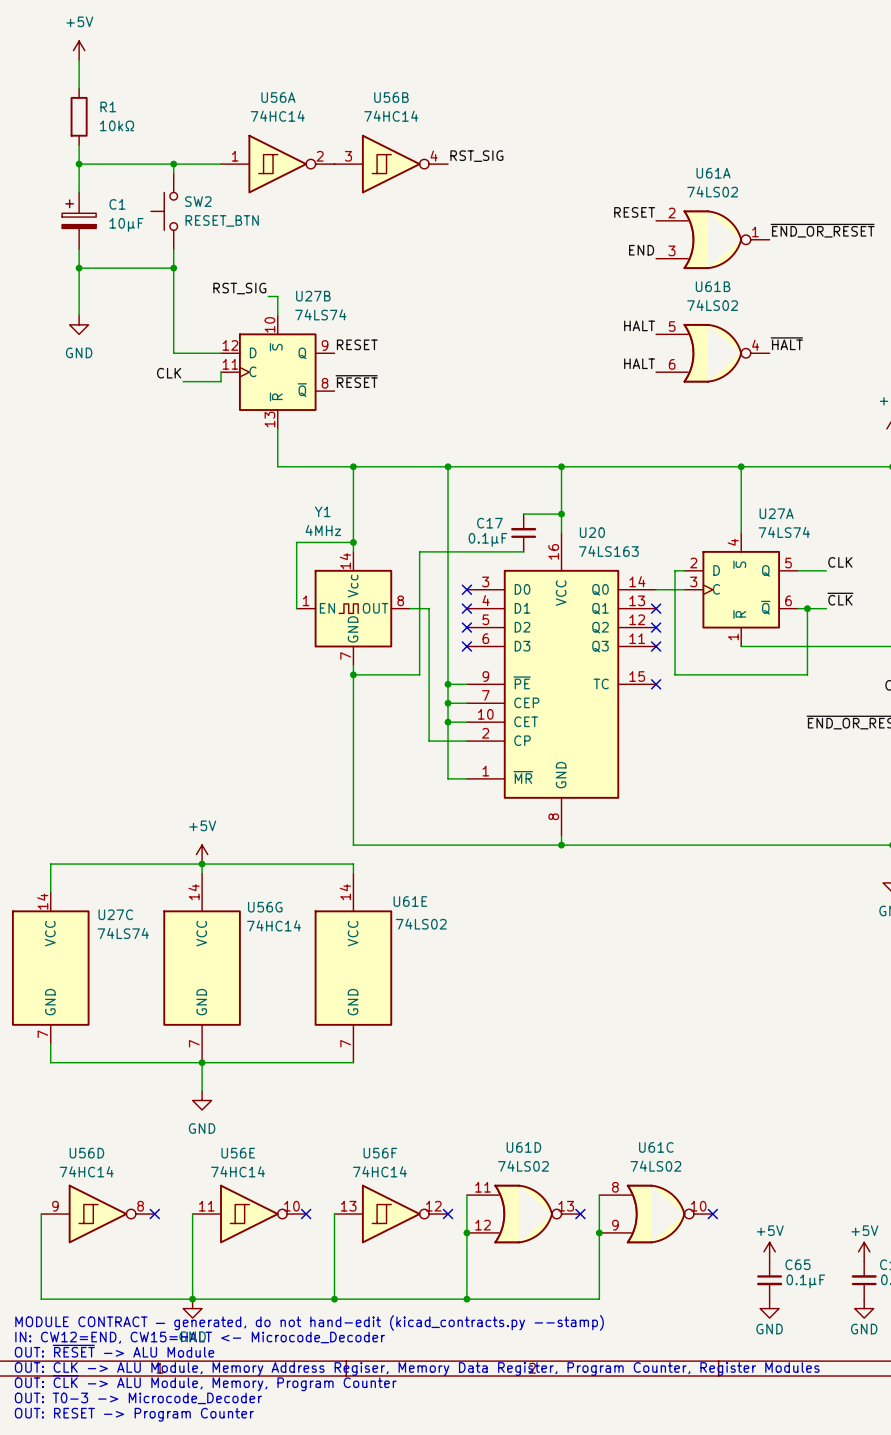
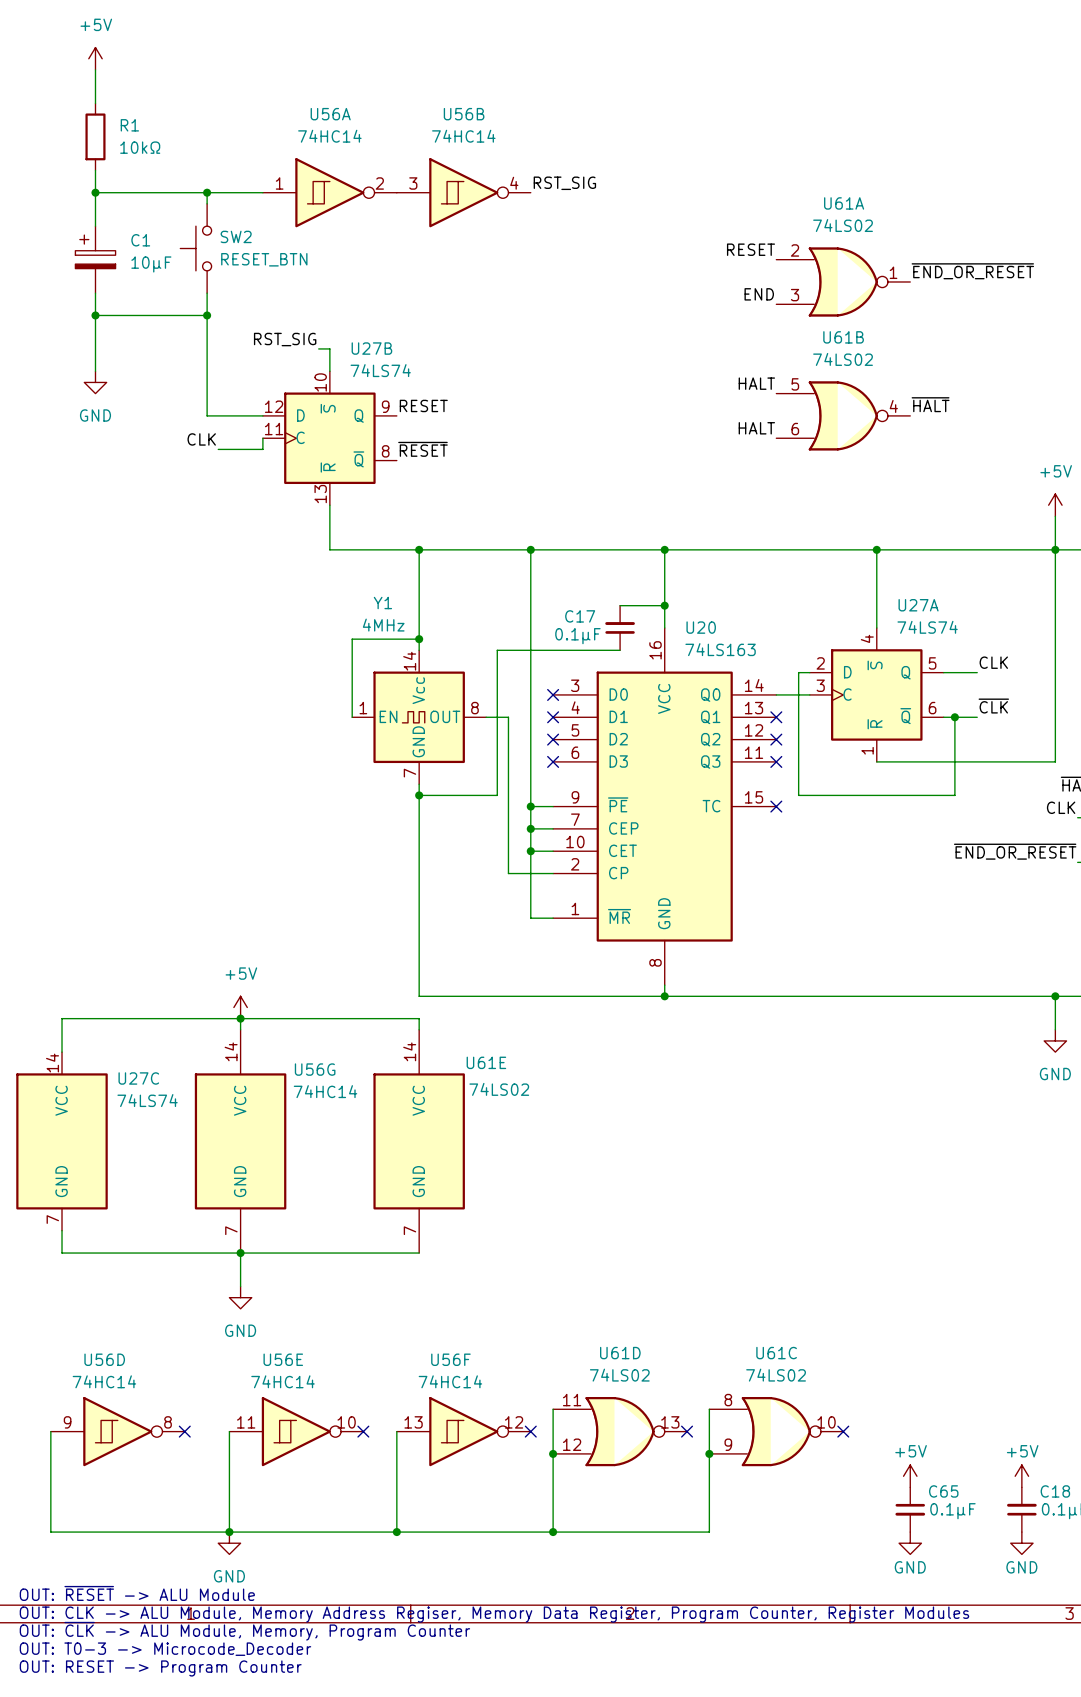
text: MODULE CONTRACT — generated, do not hand-edit (kicad_contracts.py --stamp) (309, 1322) -> none
text: IN: CW12=END, CW15=HALT <- Microcode_Decoder (200, 1337) -> none

